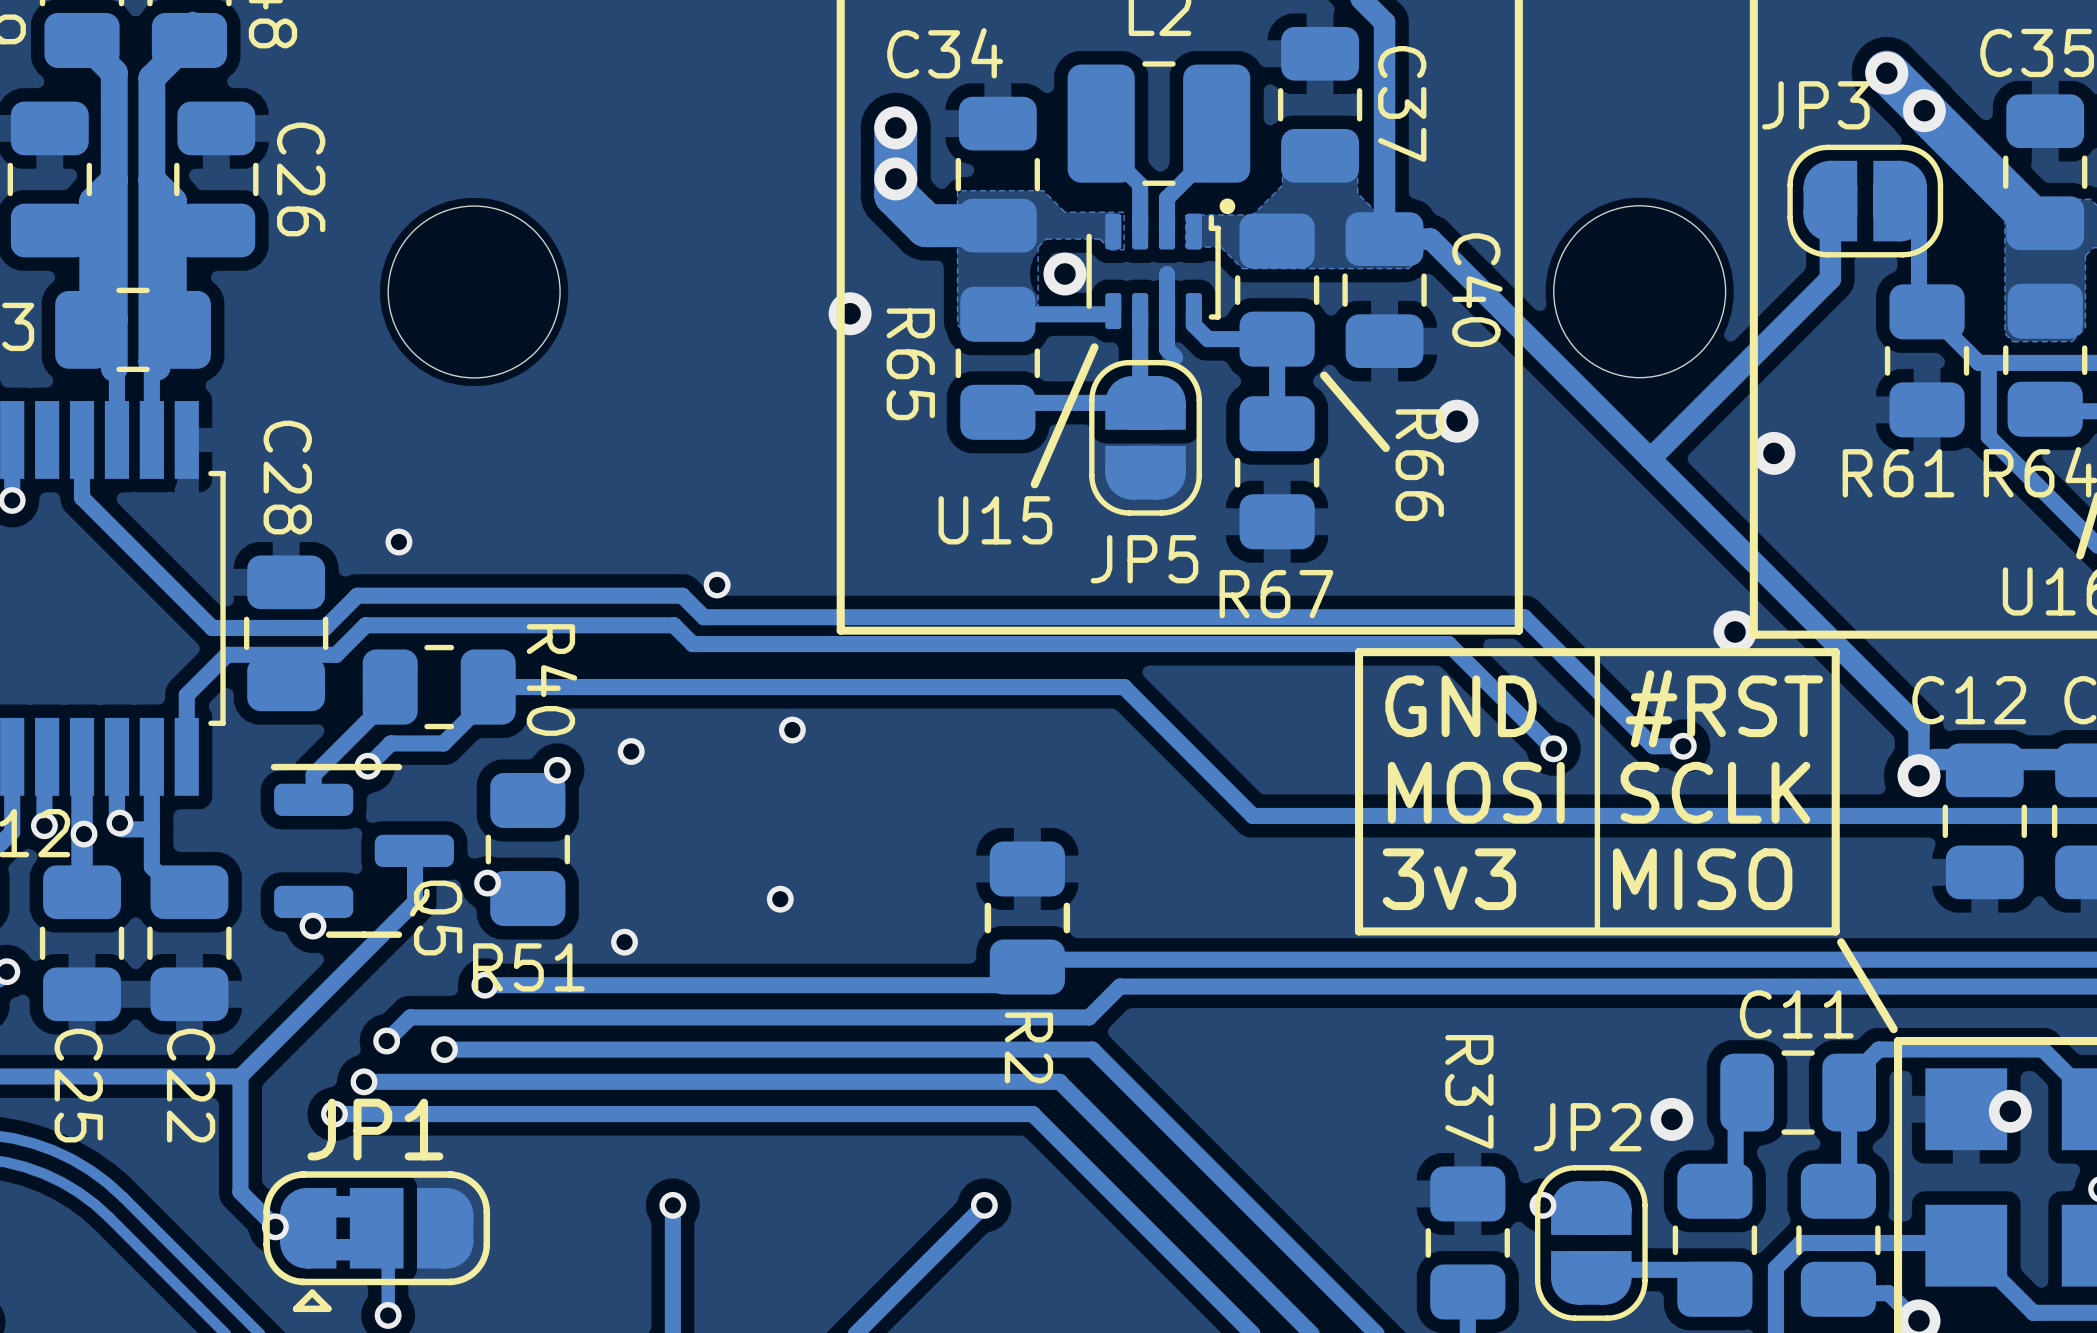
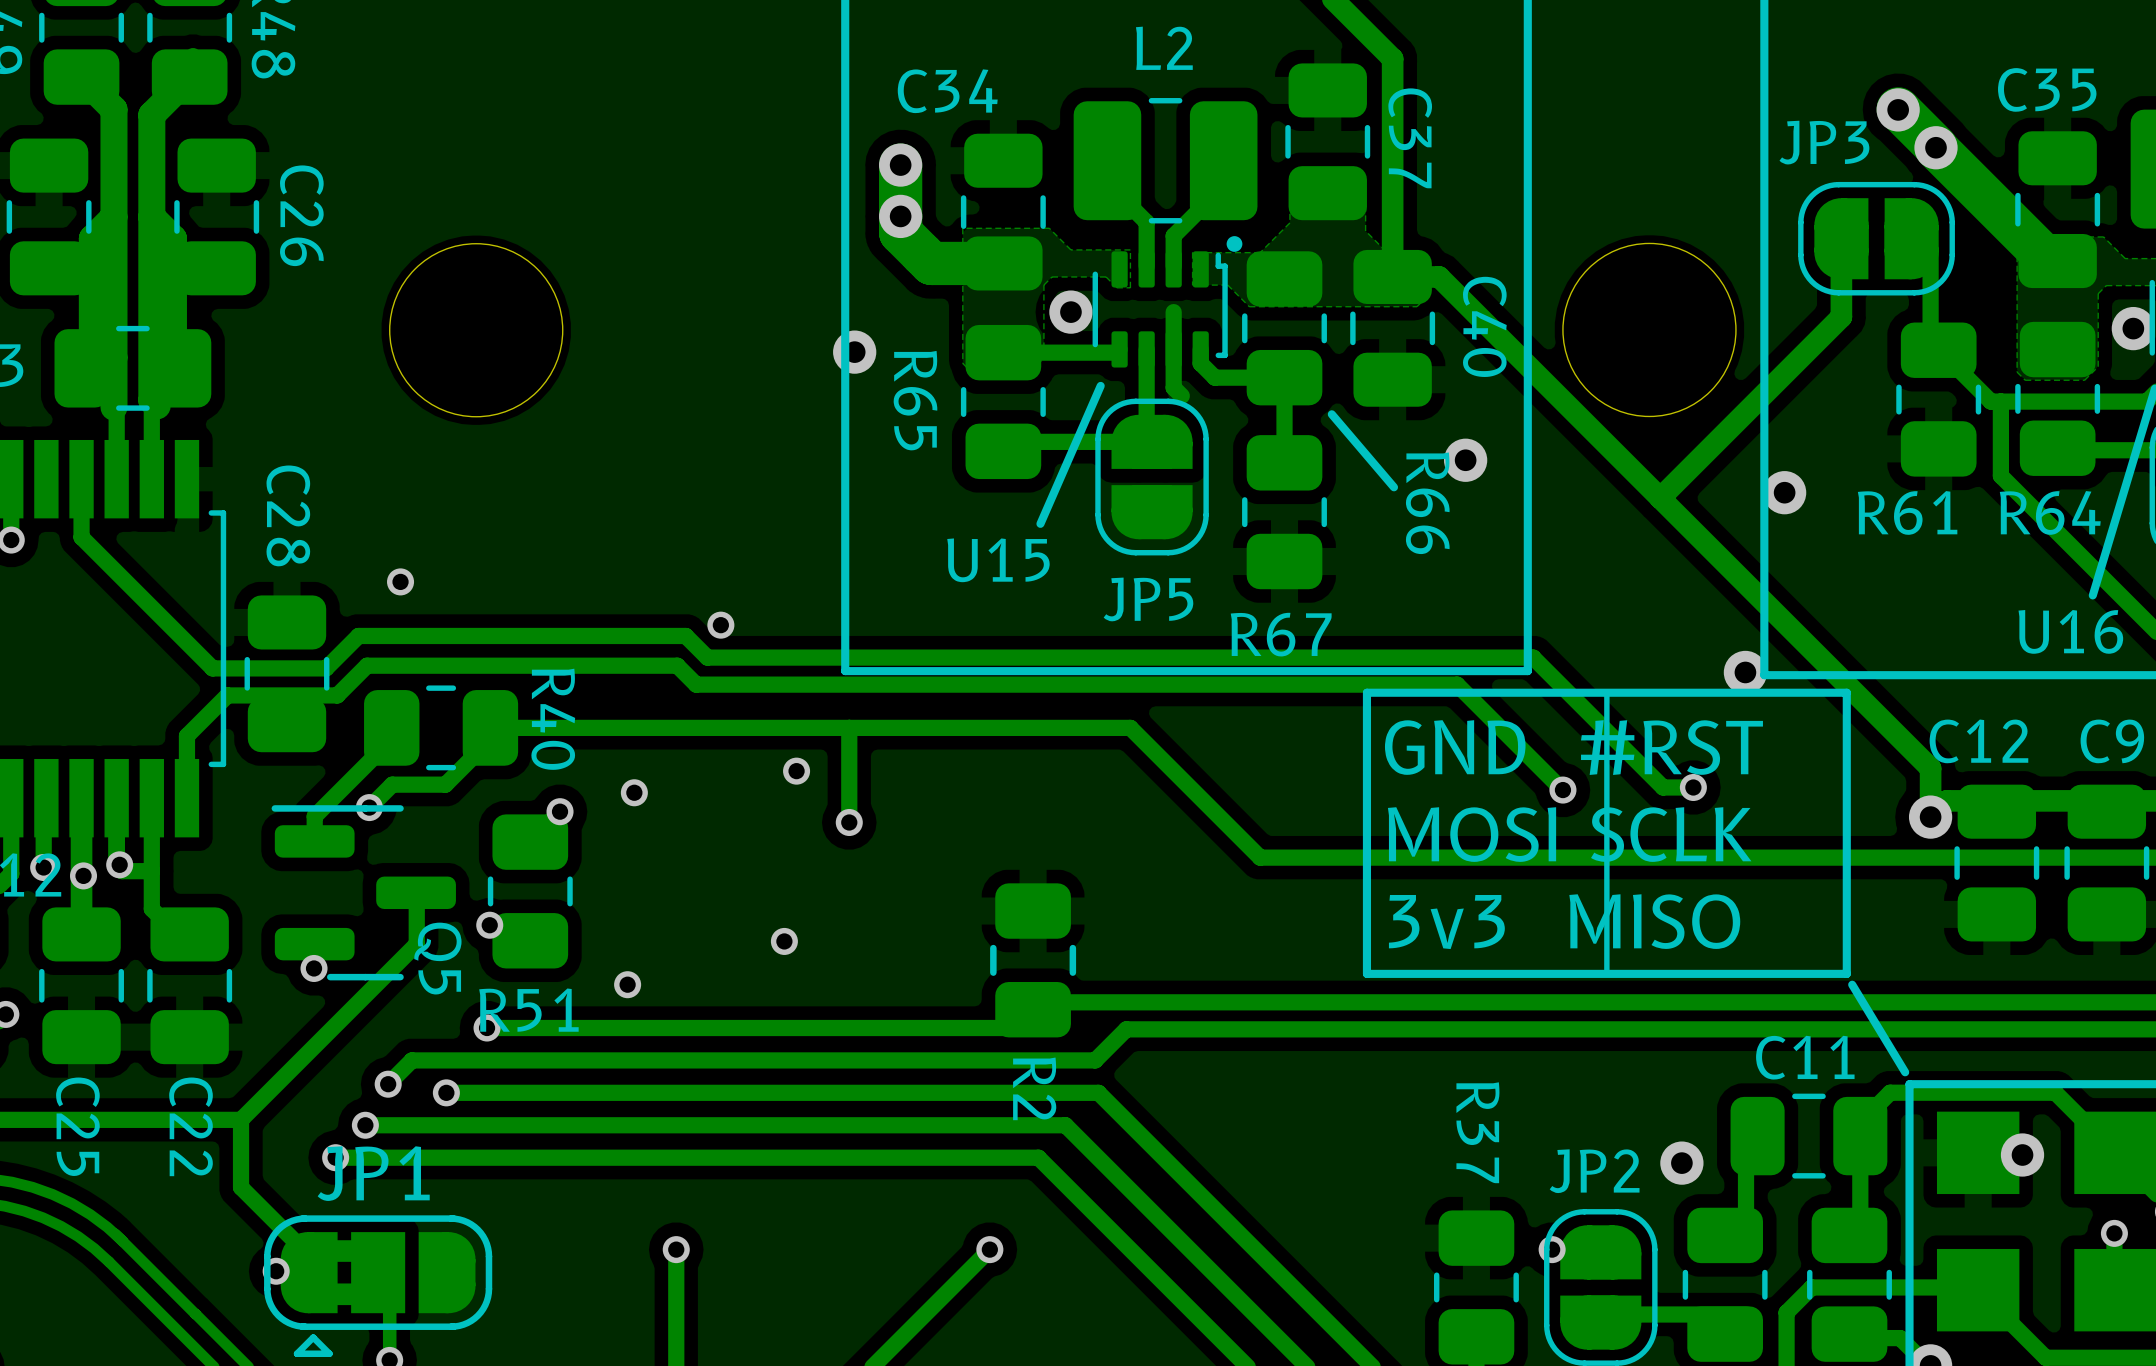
track: none -> (849, 727) (849, 822)
via: none -> (849, 822)
track: (240, 1143) (240, 1191) (275, 1226) -> (241, 1187) (317, 1263) (309, 1271) (306, 1271)

